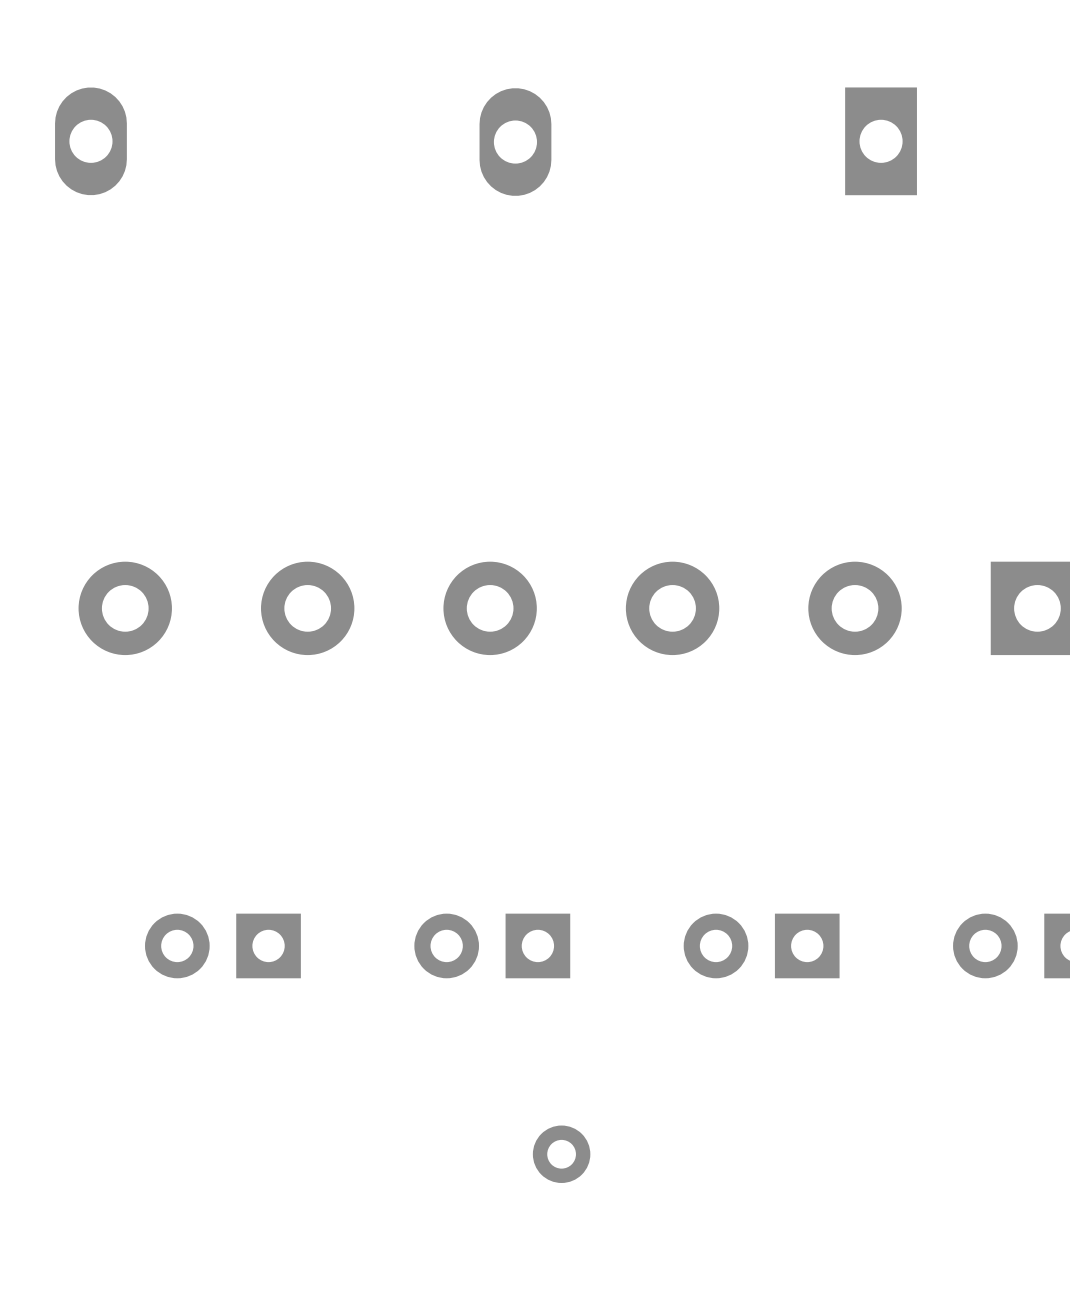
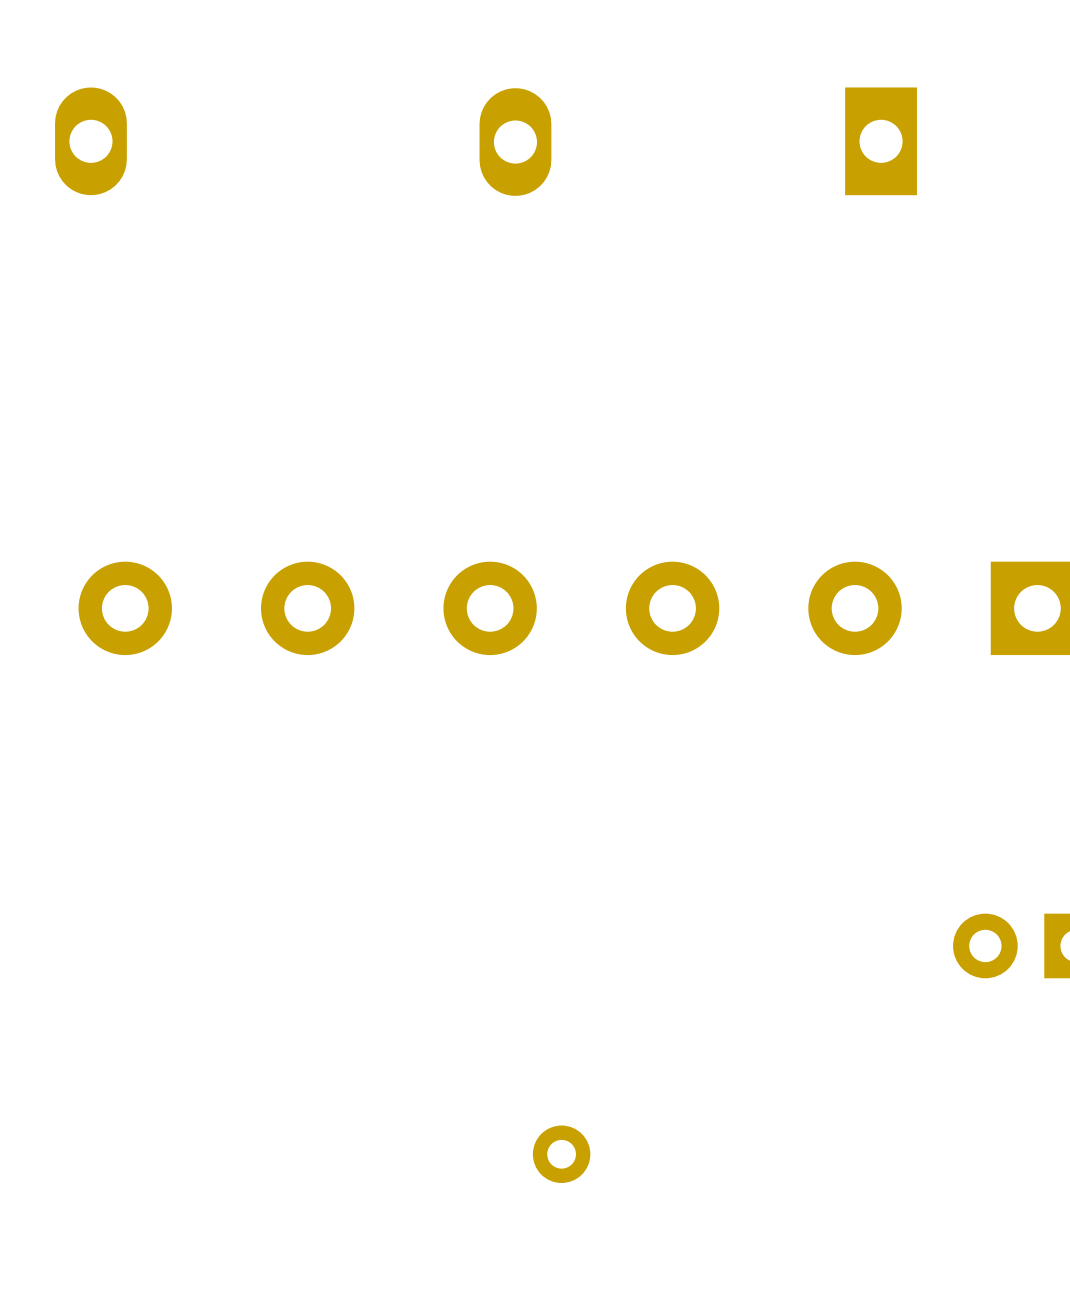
part: (222, 945) -> none
part: (492, 945) -> none
part: (761, 945) -> none

